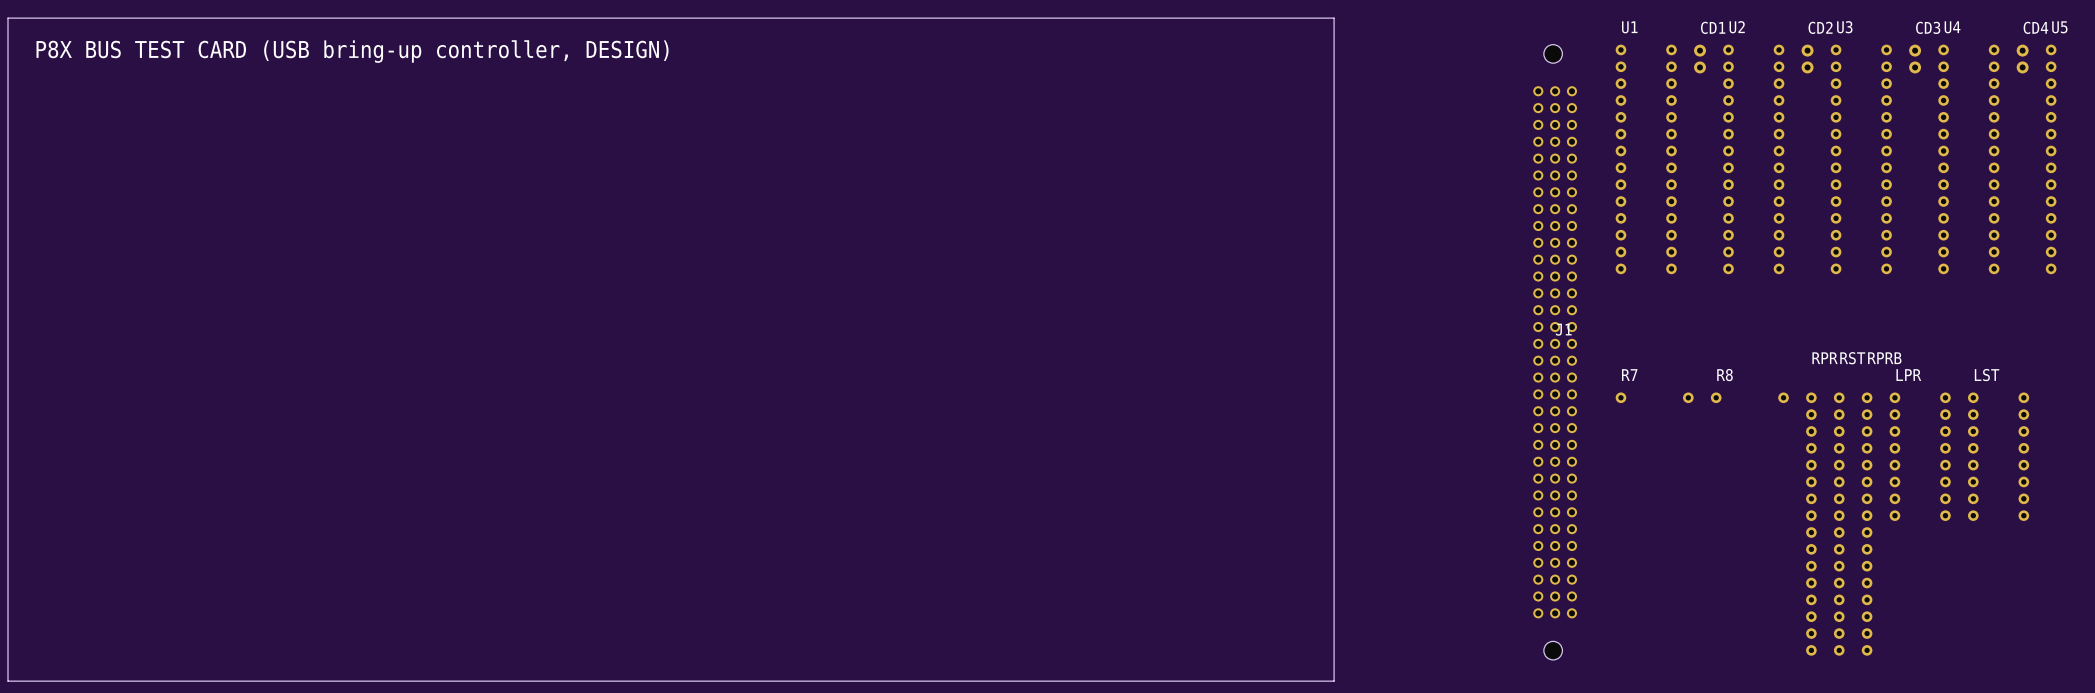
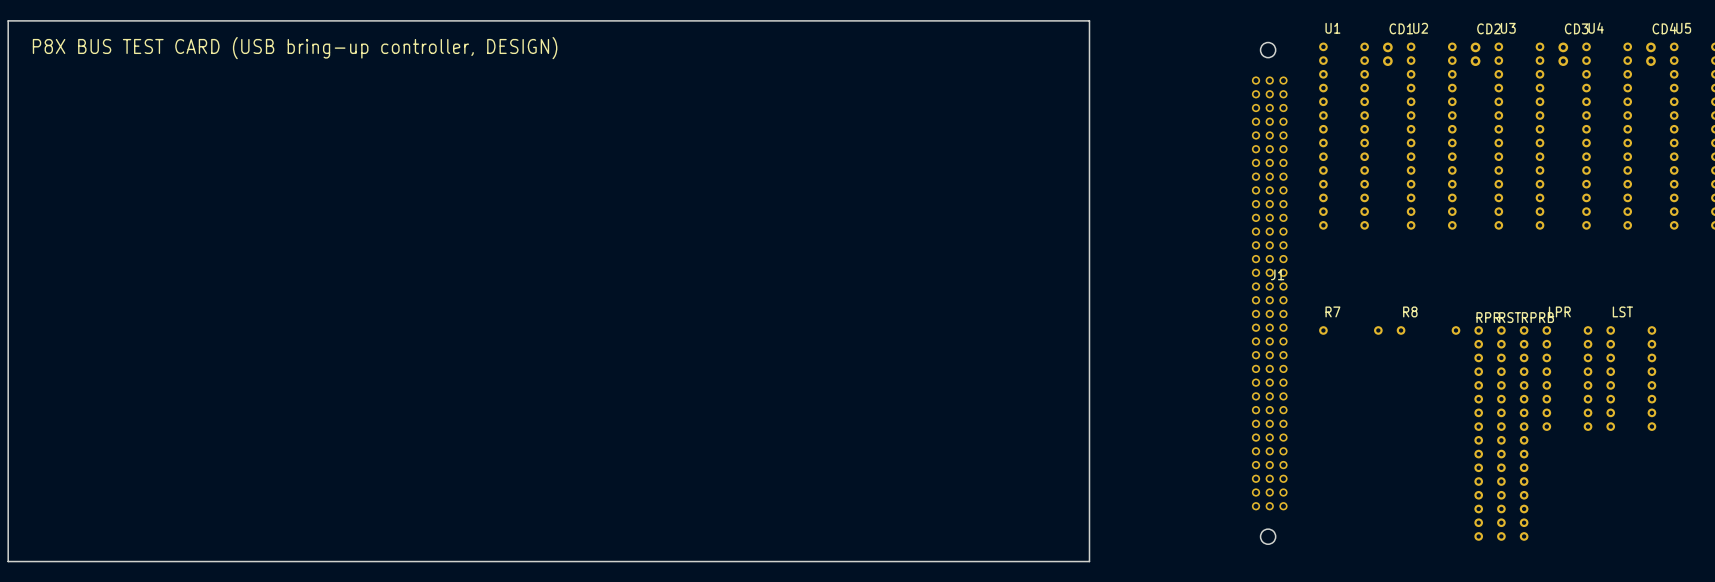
RPR name position: RPR (1825, 358) -> RPR (1488, 317)
RST name position: RST (1852, 358) -> RST (1510, 317)
RPRB name position: RPRB (1884, 358) -> RPRB (1537, 317)

